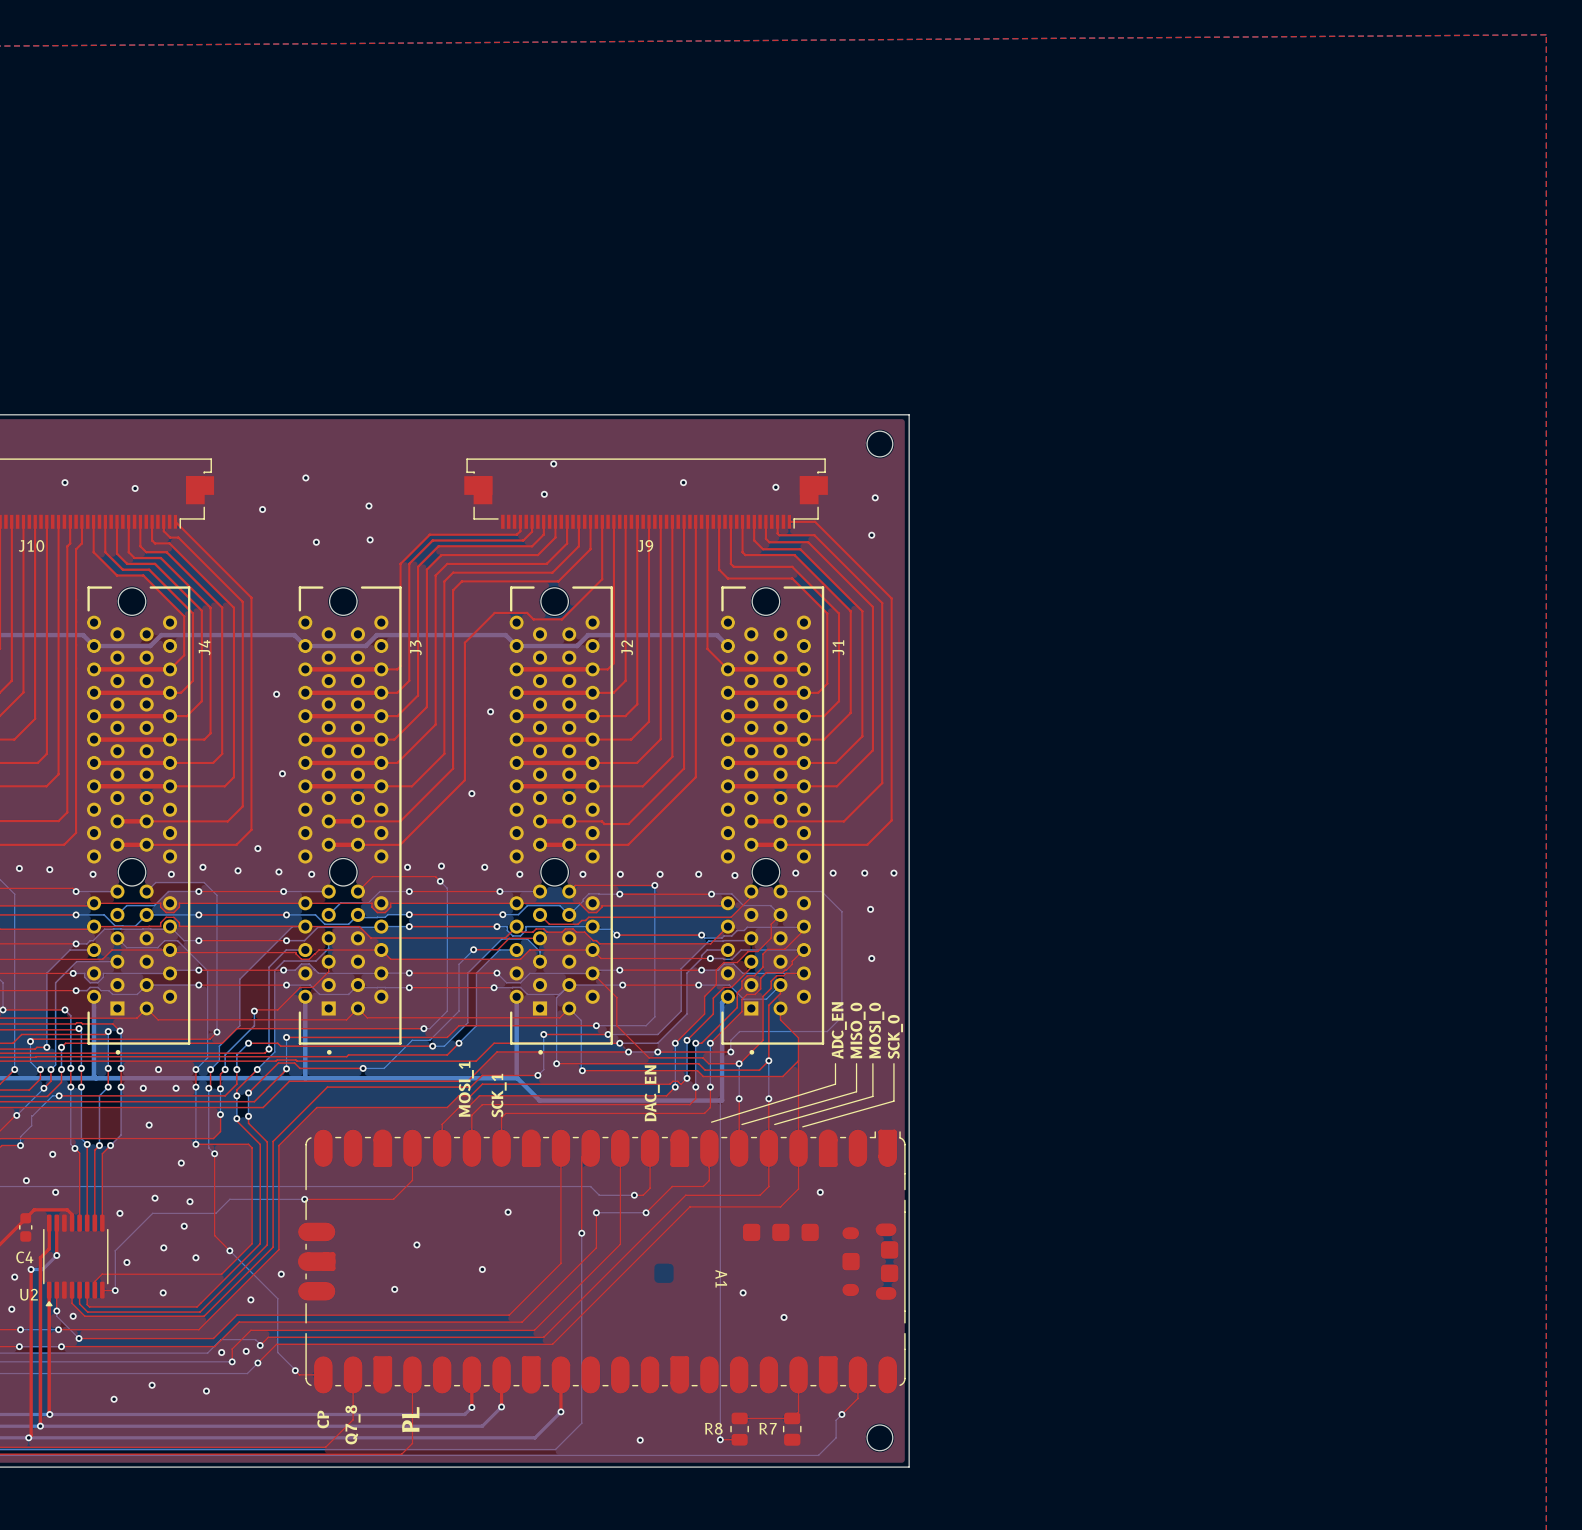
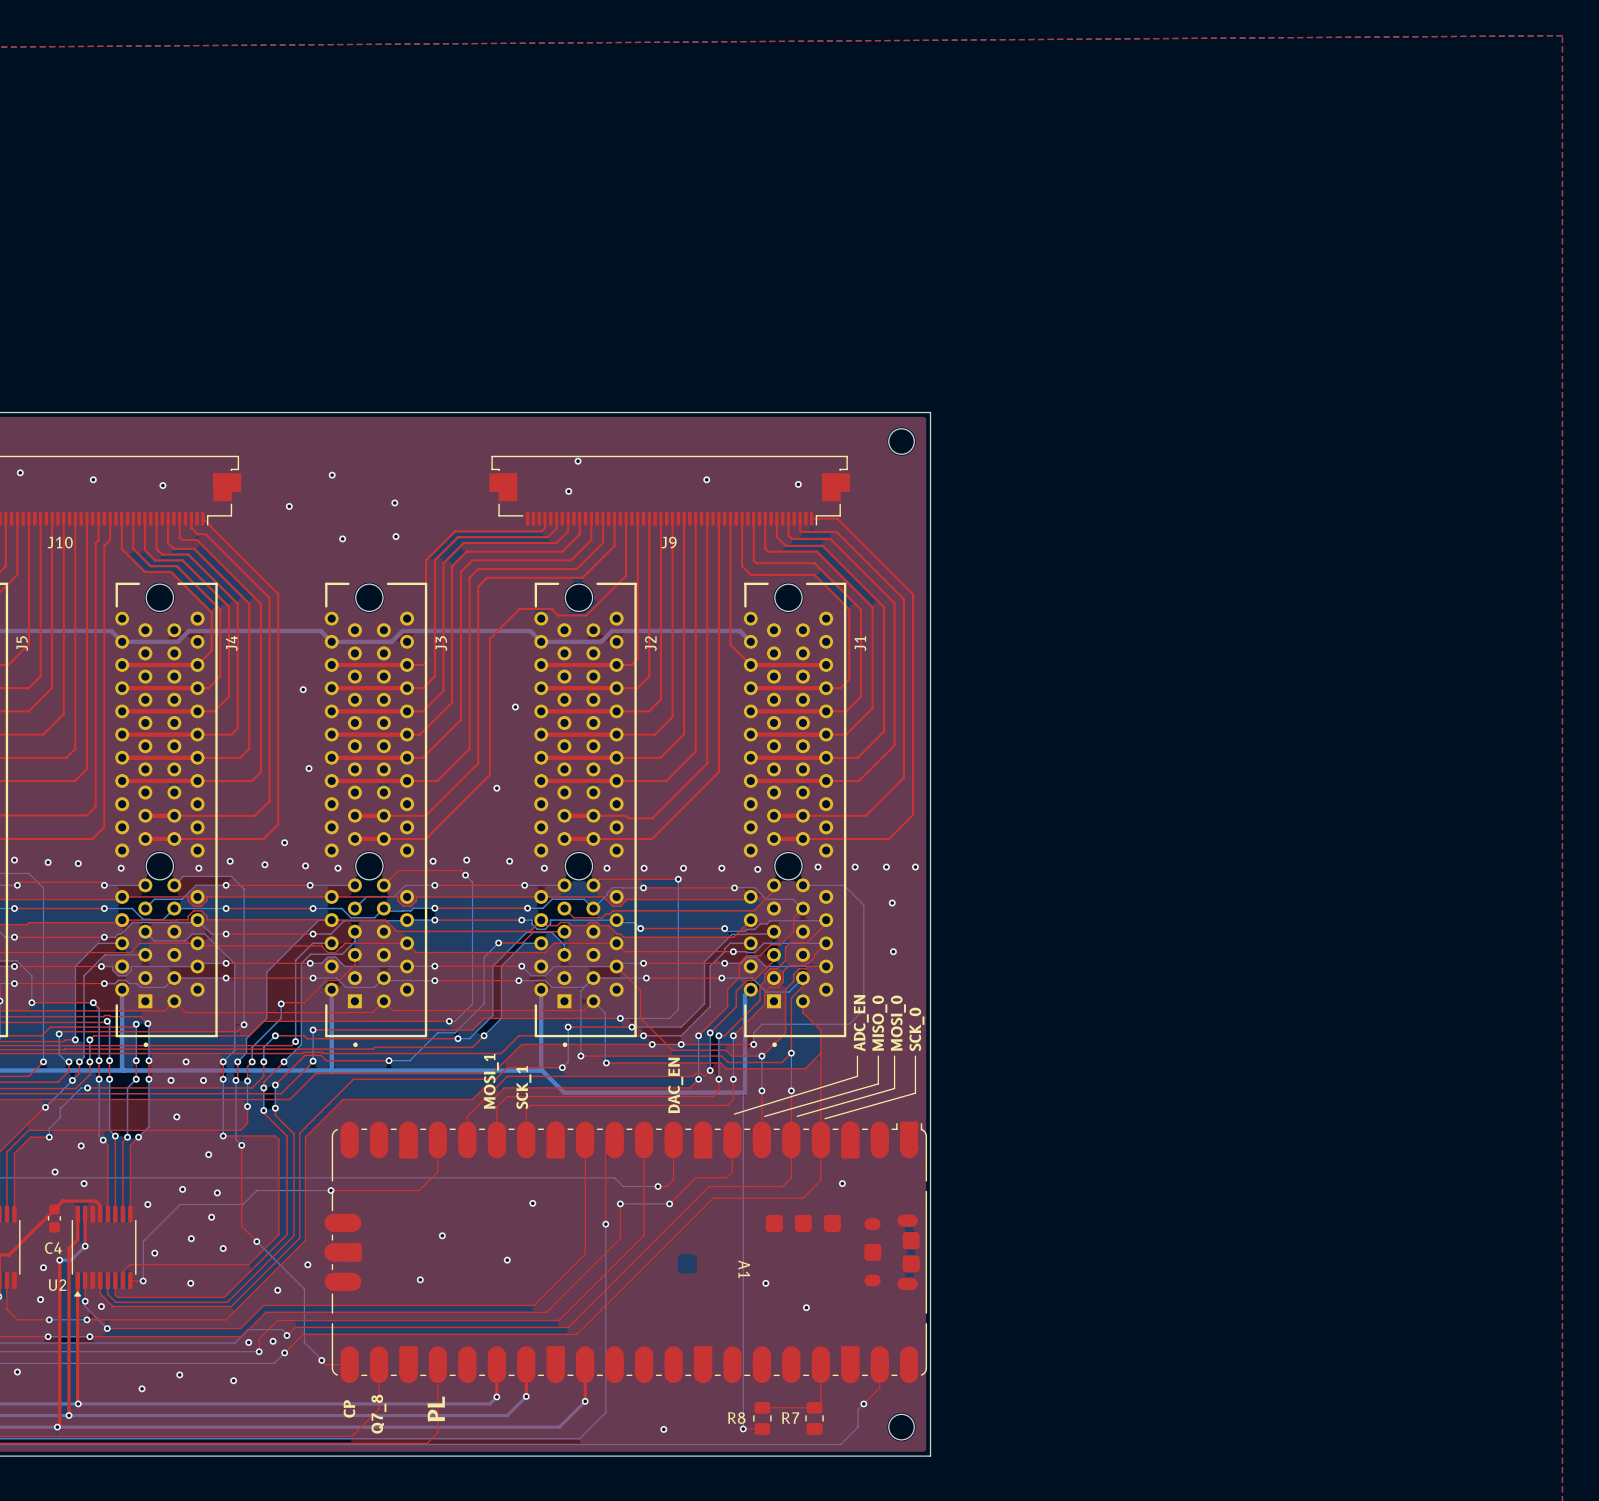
via: (875, 497) -> none
via: (871, 535) -> none

